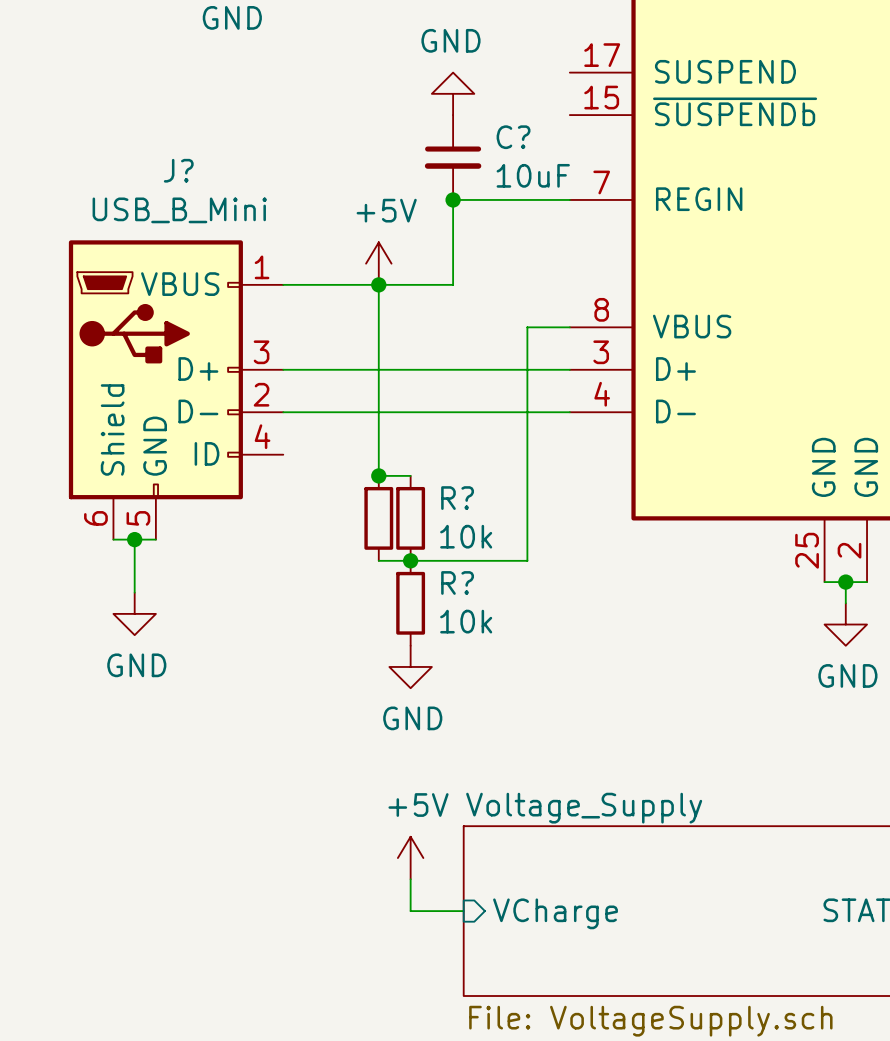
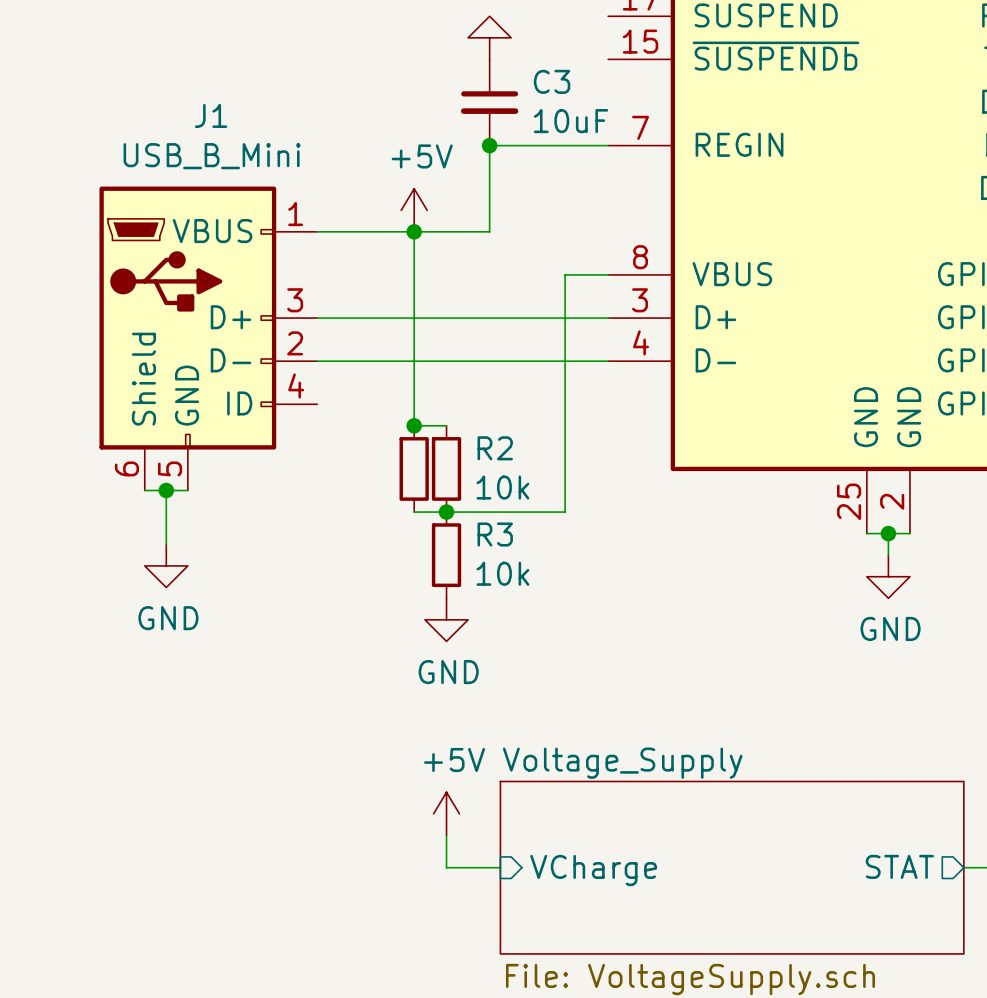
C? name: C? (513, 137) -> C3 (552, 81)
J? name: J? (178, 170) -> J1 (211, 115)
R? name: R? (457, 498) -> R2 (495, 448)
R? name: R? (457, 582) -> R3 (495, 534)

